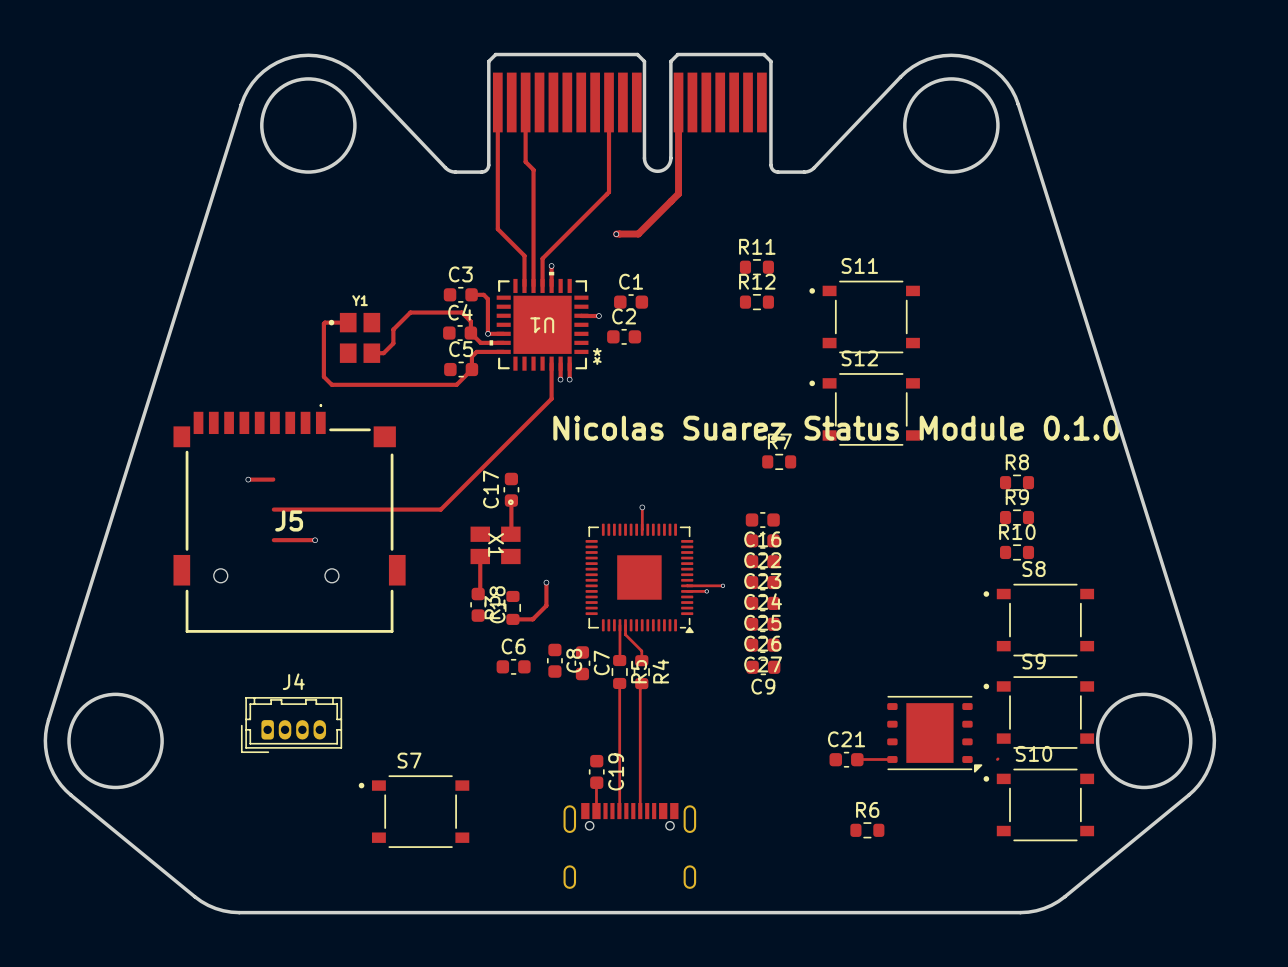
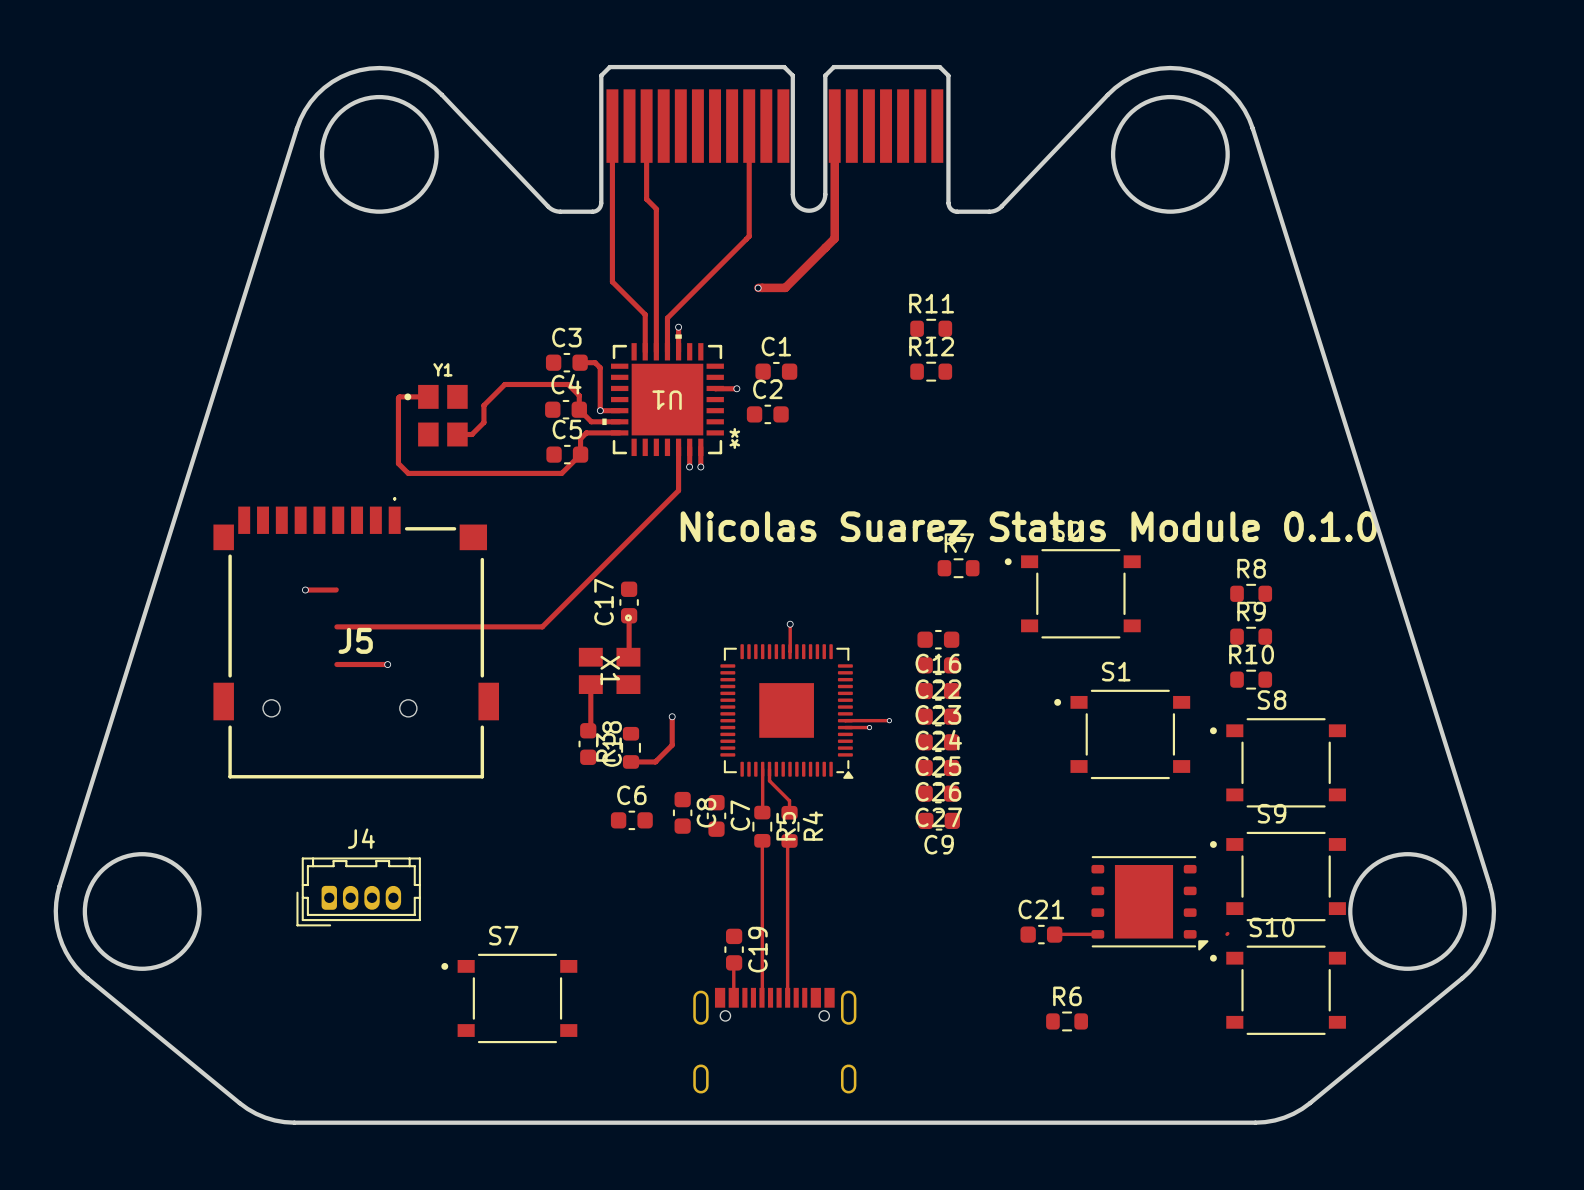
S11: (864, 316) -> none
S12: (864, 409) -> none
part: none -> (1072, 593)
S1: none -> (1122, 734)

